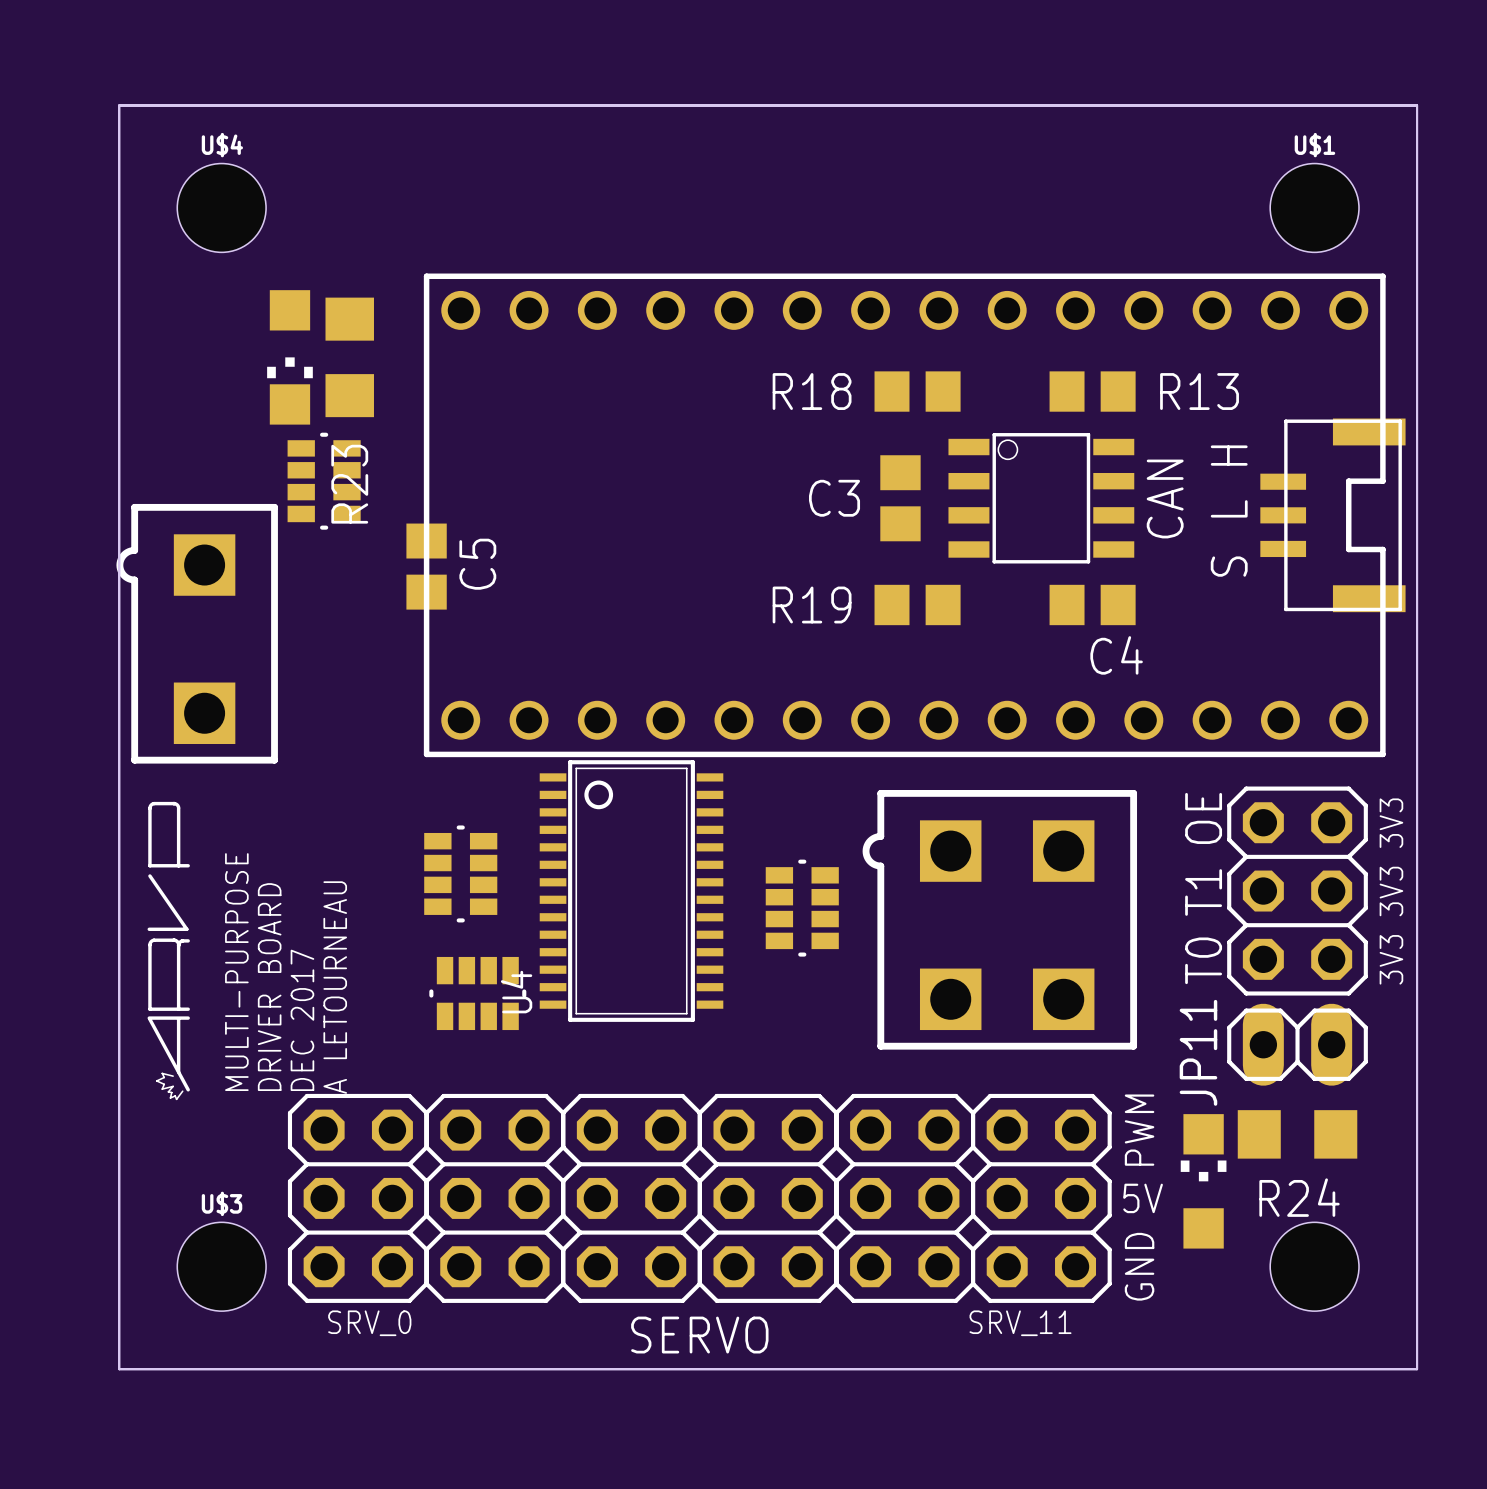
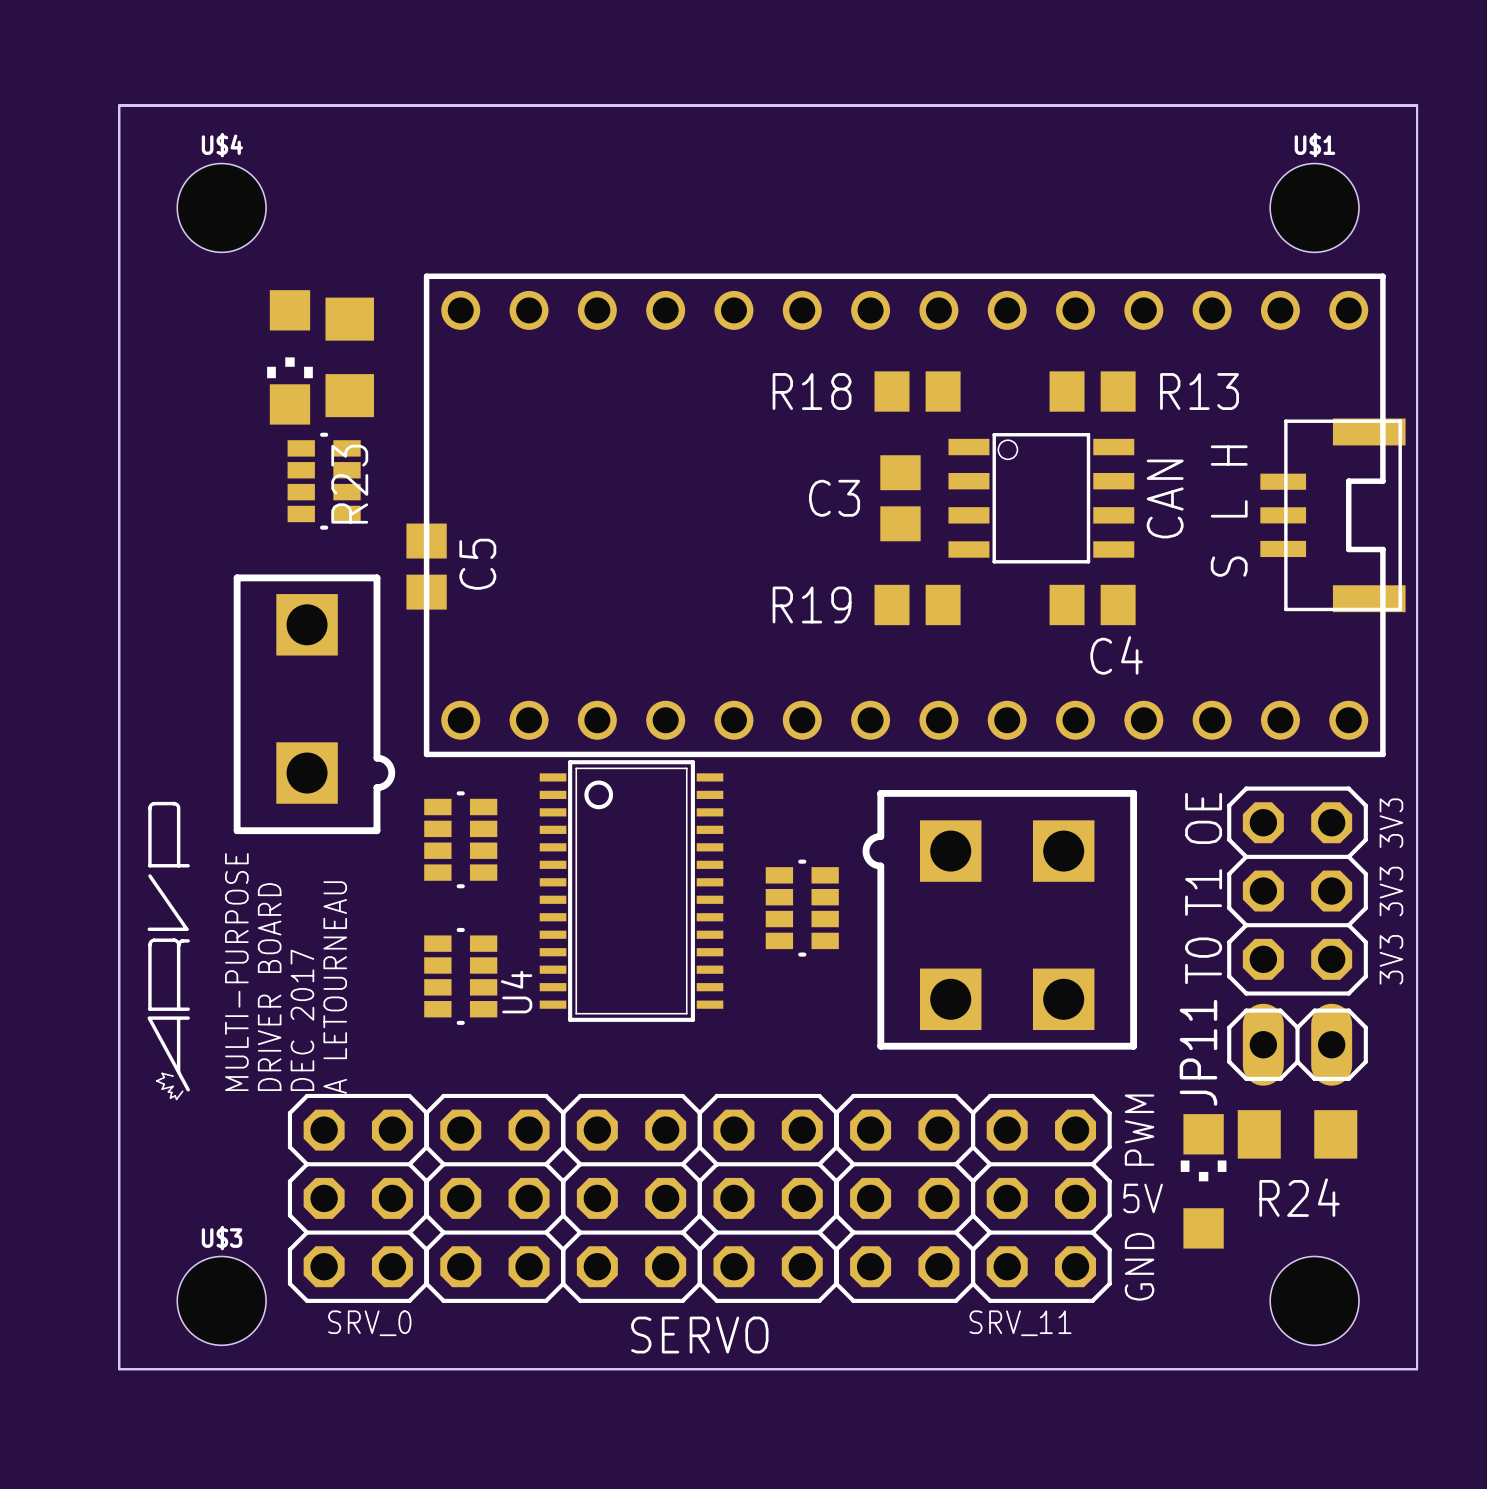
part rotation: 0° (197, 633) -> 180° (314, 704)
part position: (460, 873) -> (460, 839)
part rotation: 0° (477, 993) -> 90° clockwise (460, 976)
U$3 position: (221, 1266) -> (221, 1300)
part position: (1314, 1266) -> (1314, 1300)

